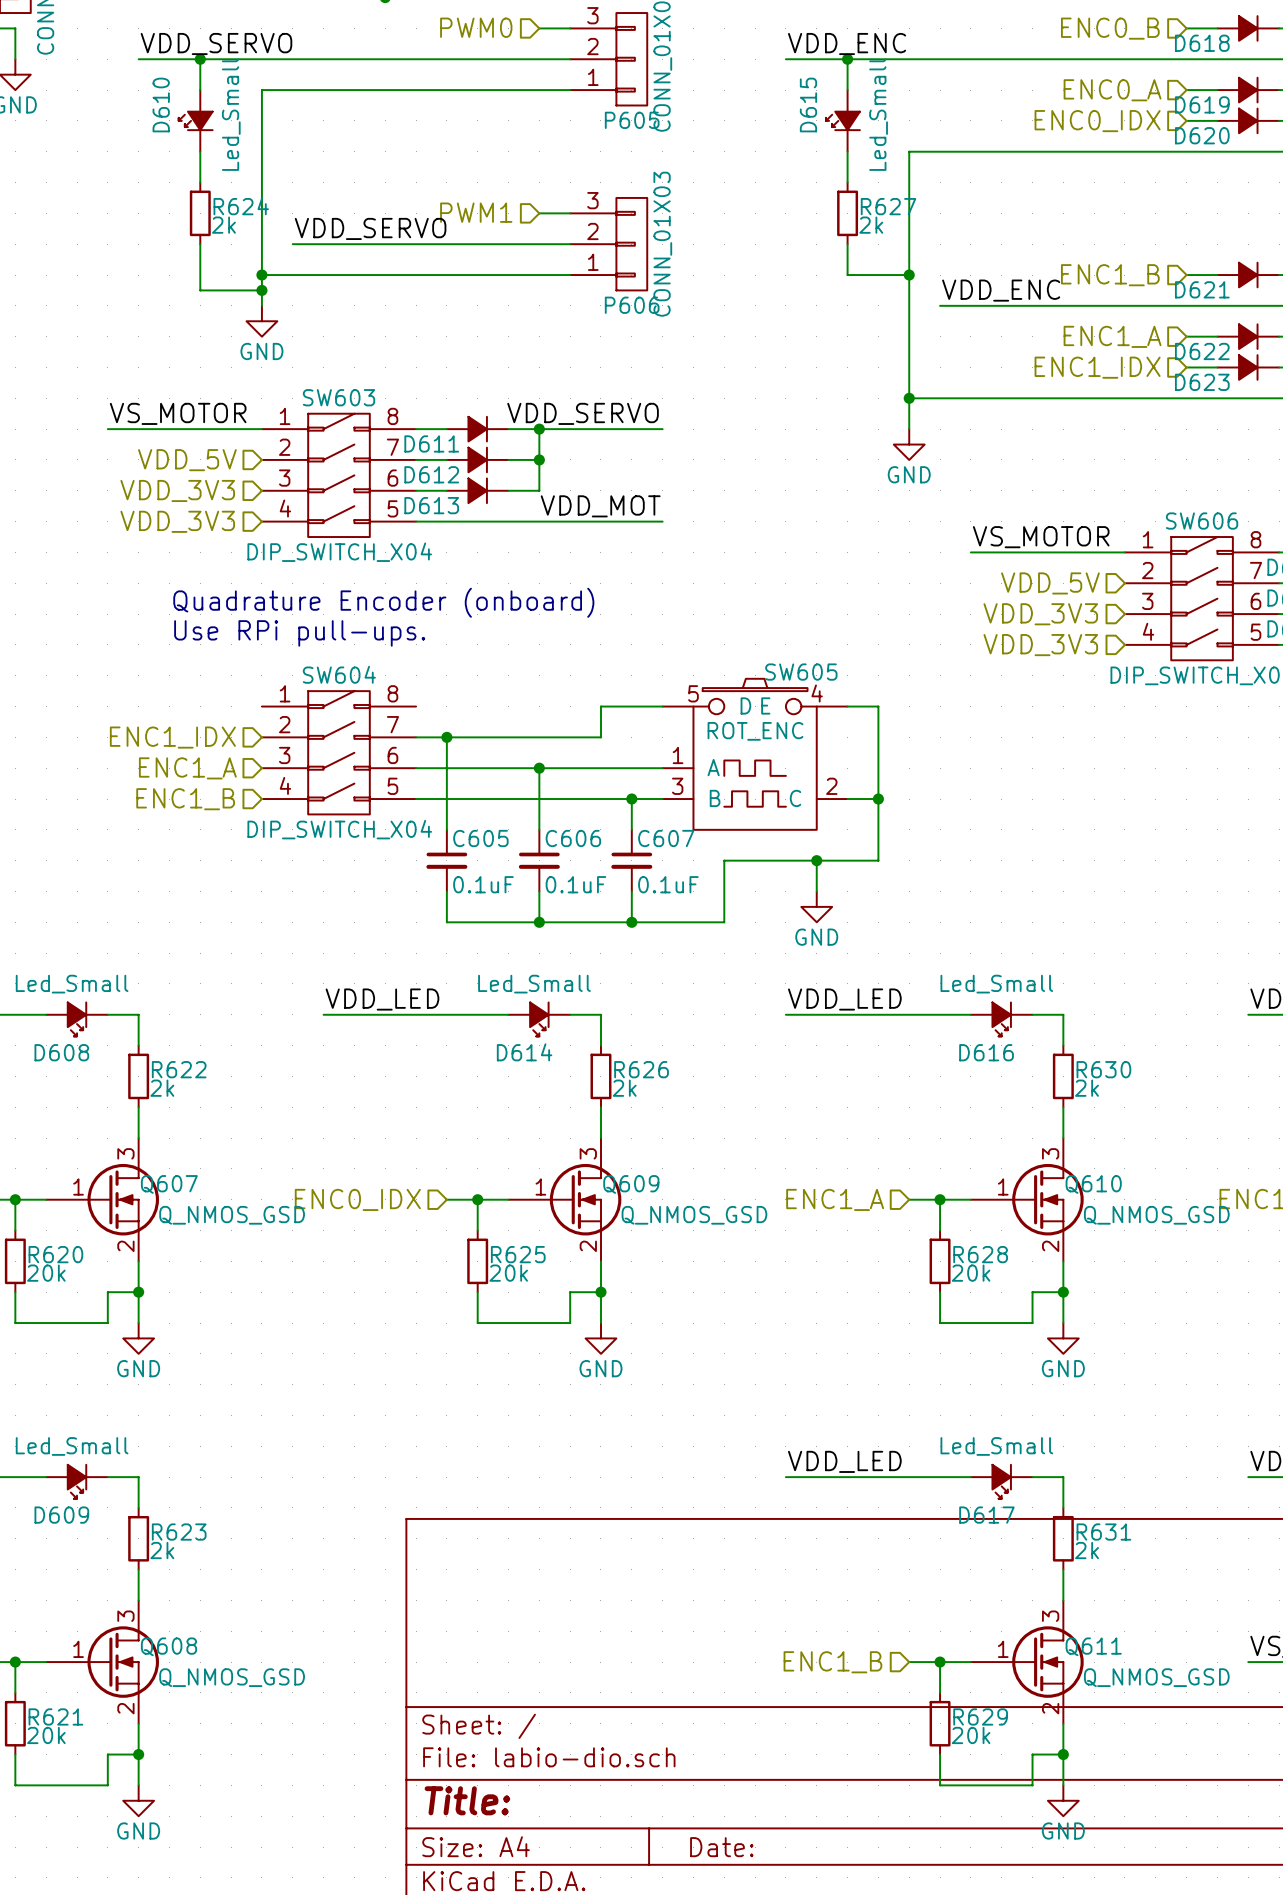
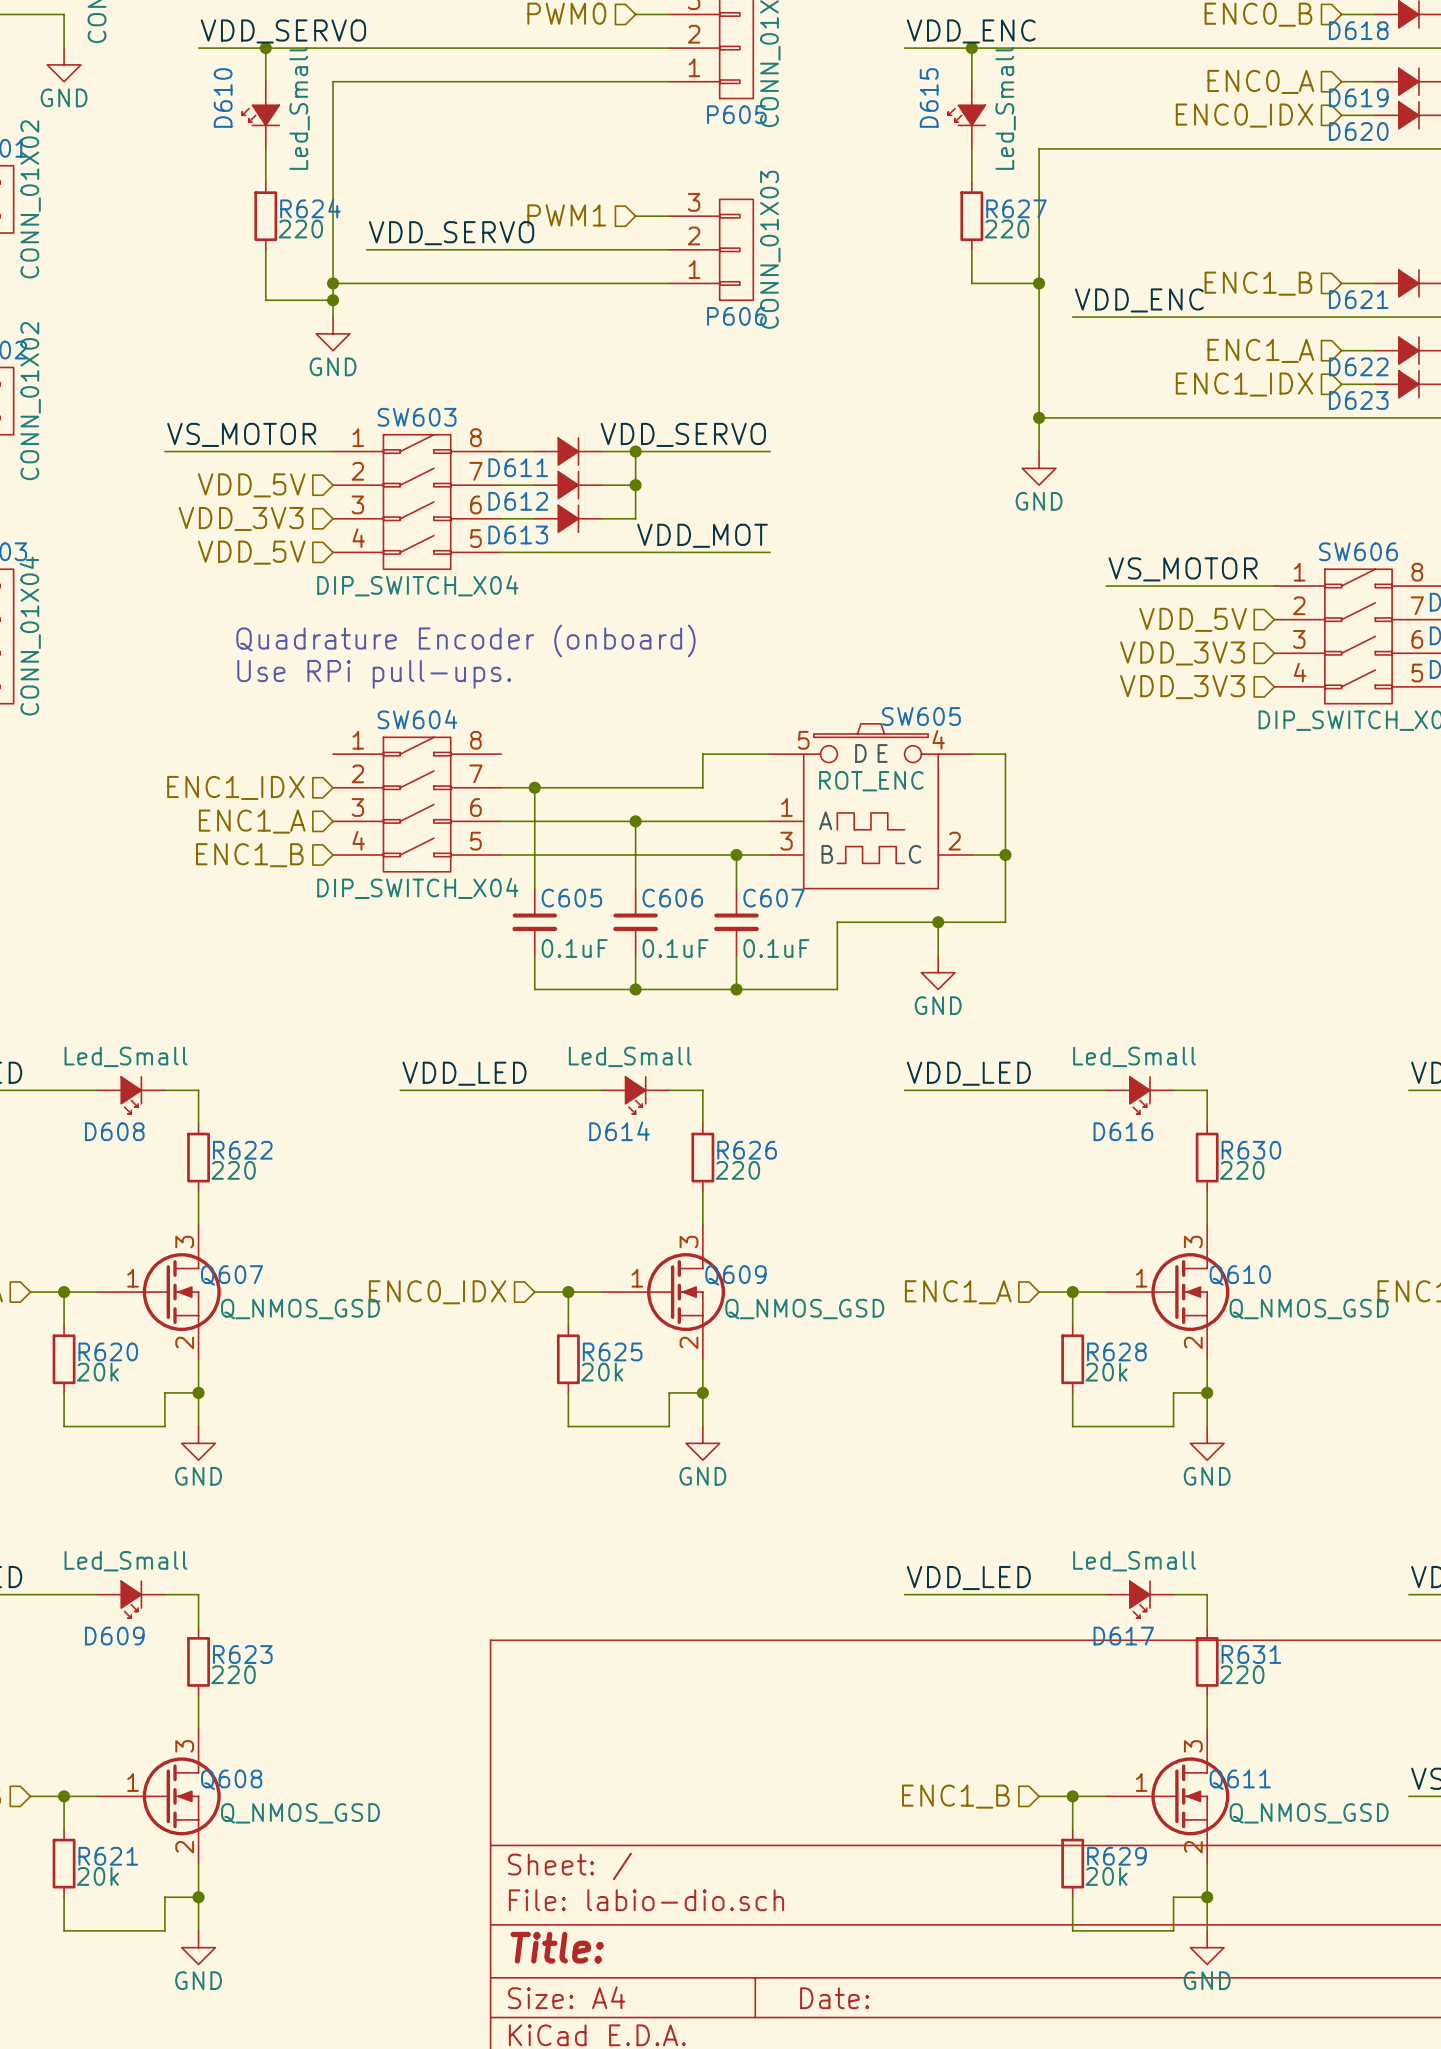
R624 value: 2k (223, 225) -> 220 (300, 229)
R627 value: 2k (871, 225) -> 220 (1006, 229)
hierarchical label: VDD_3V3 (177, 521) -> VDD_5V (251, 552)
R622 value: 2k (162, 1088) -> 220 (233, 1170)
R626 value: 2k (624, 1088) -> 220 (737, 1170)
R630 value: 2k (1087, 1088) -> 220 (1242, 1170)
R623 value: 2k (162, 1550) -> 220 (233, 1674)
R631 value: 2k (1087, 1550) -> 220 (1242, 1674)

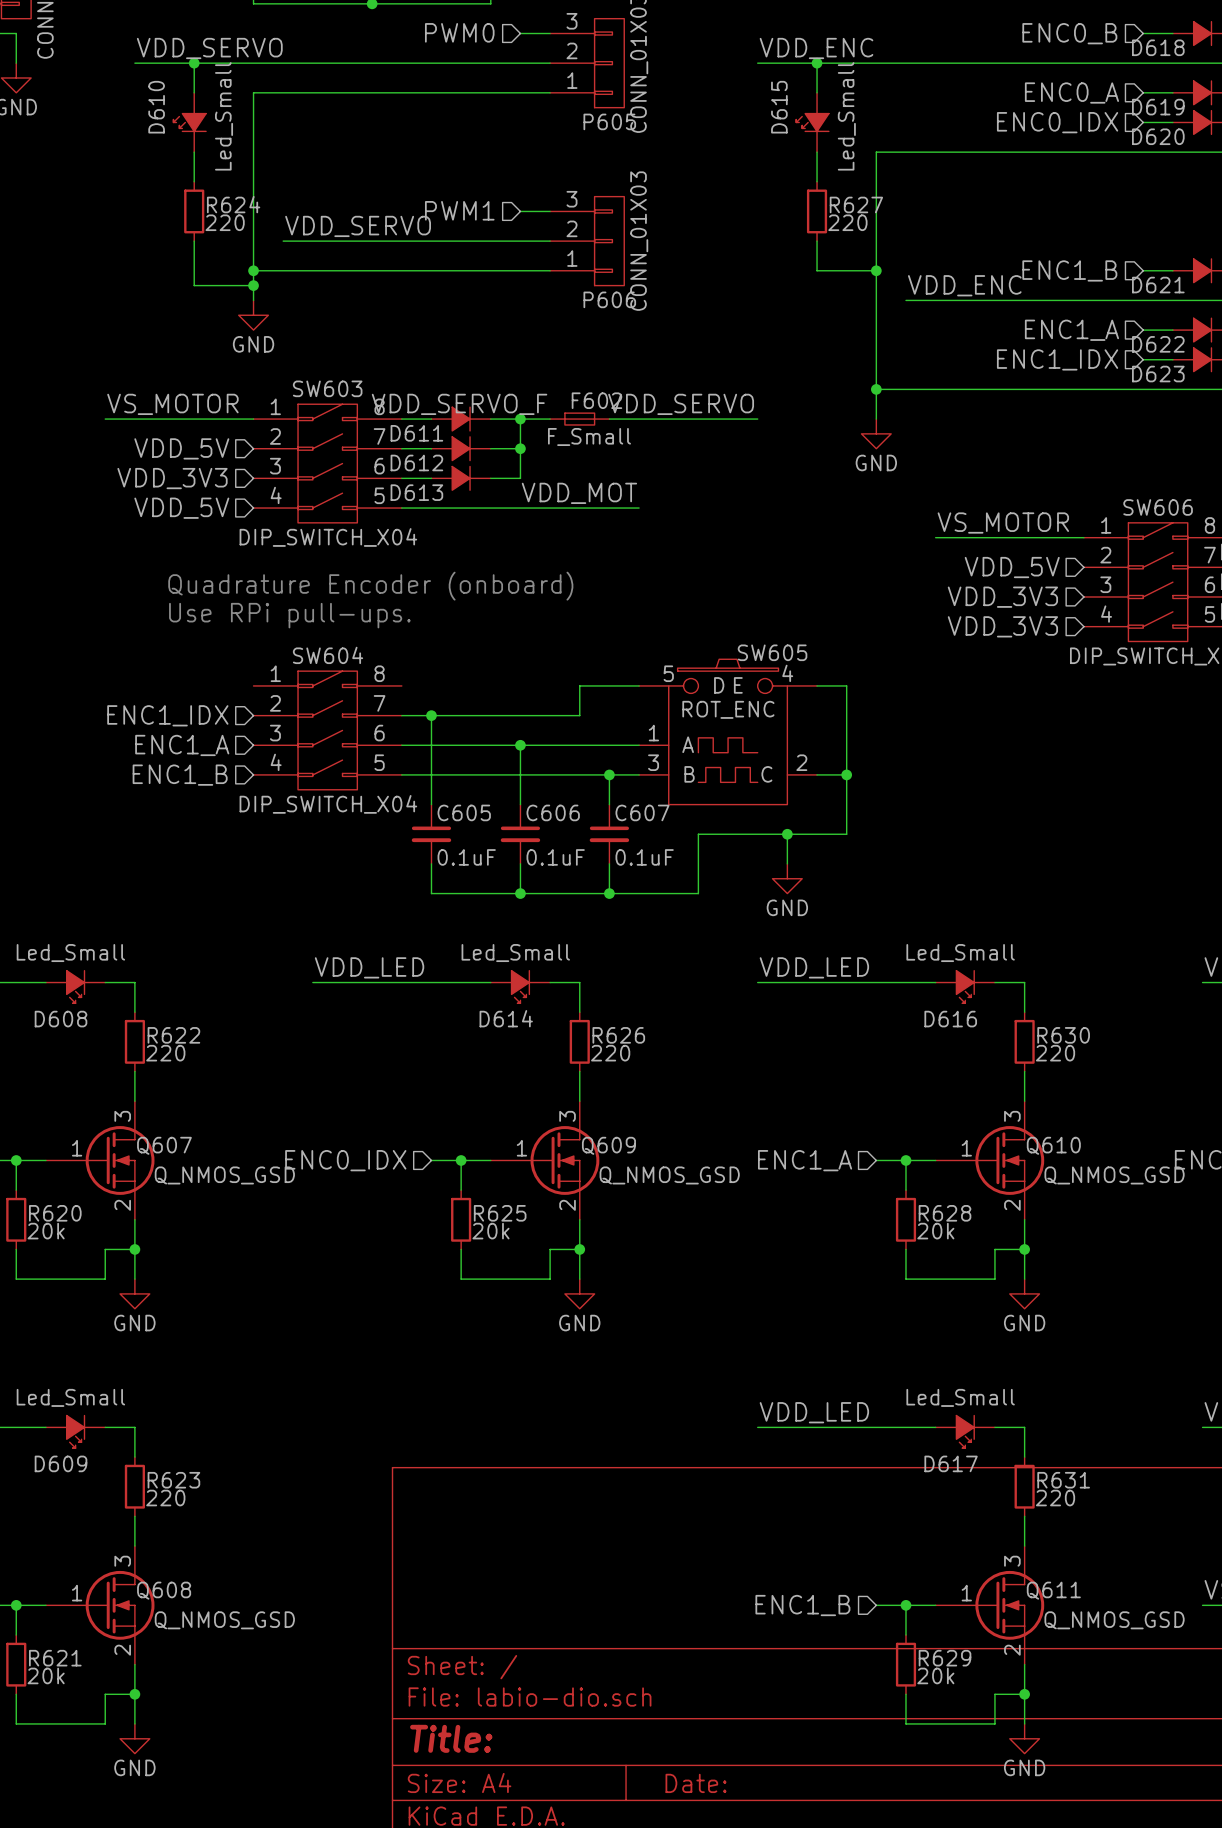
label: none -> VDD_SERVO_F (459, 404)
label position: VDD_SERVO (683, 434) -> VDD_SERVO (681, 404)
F602: none -> F_Small (579, 419)
wire: none -> (639, 419) (757, 419)

